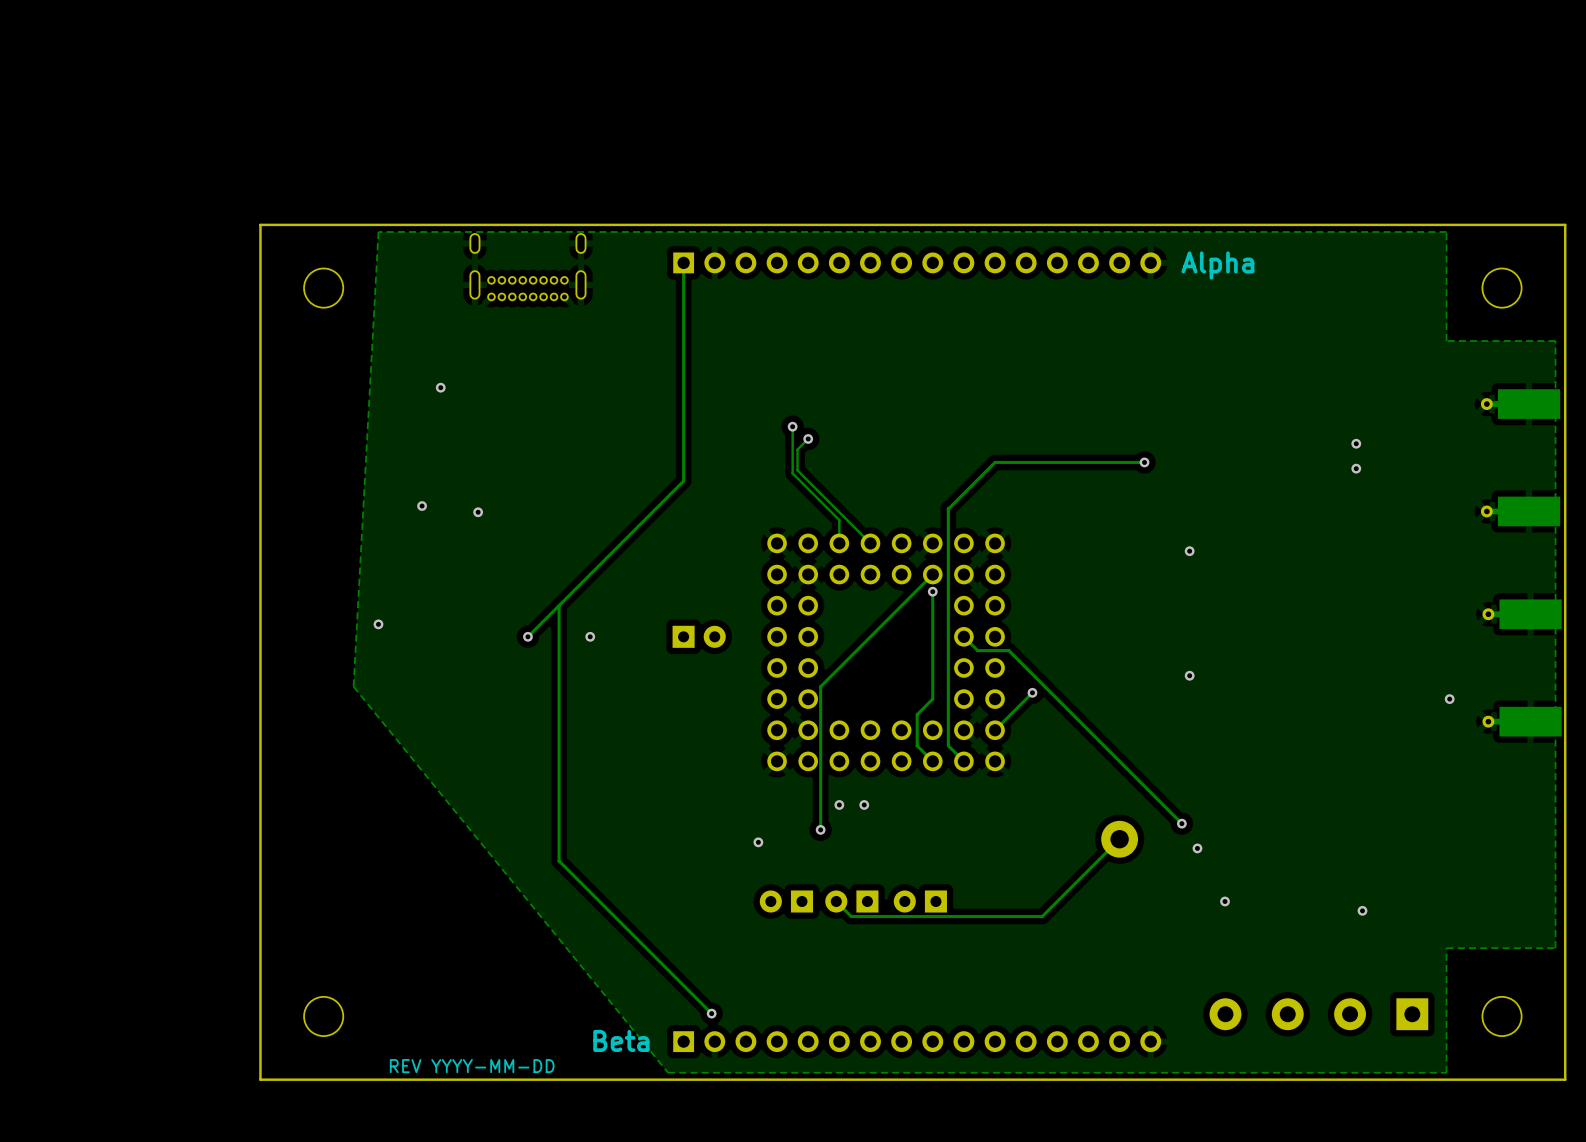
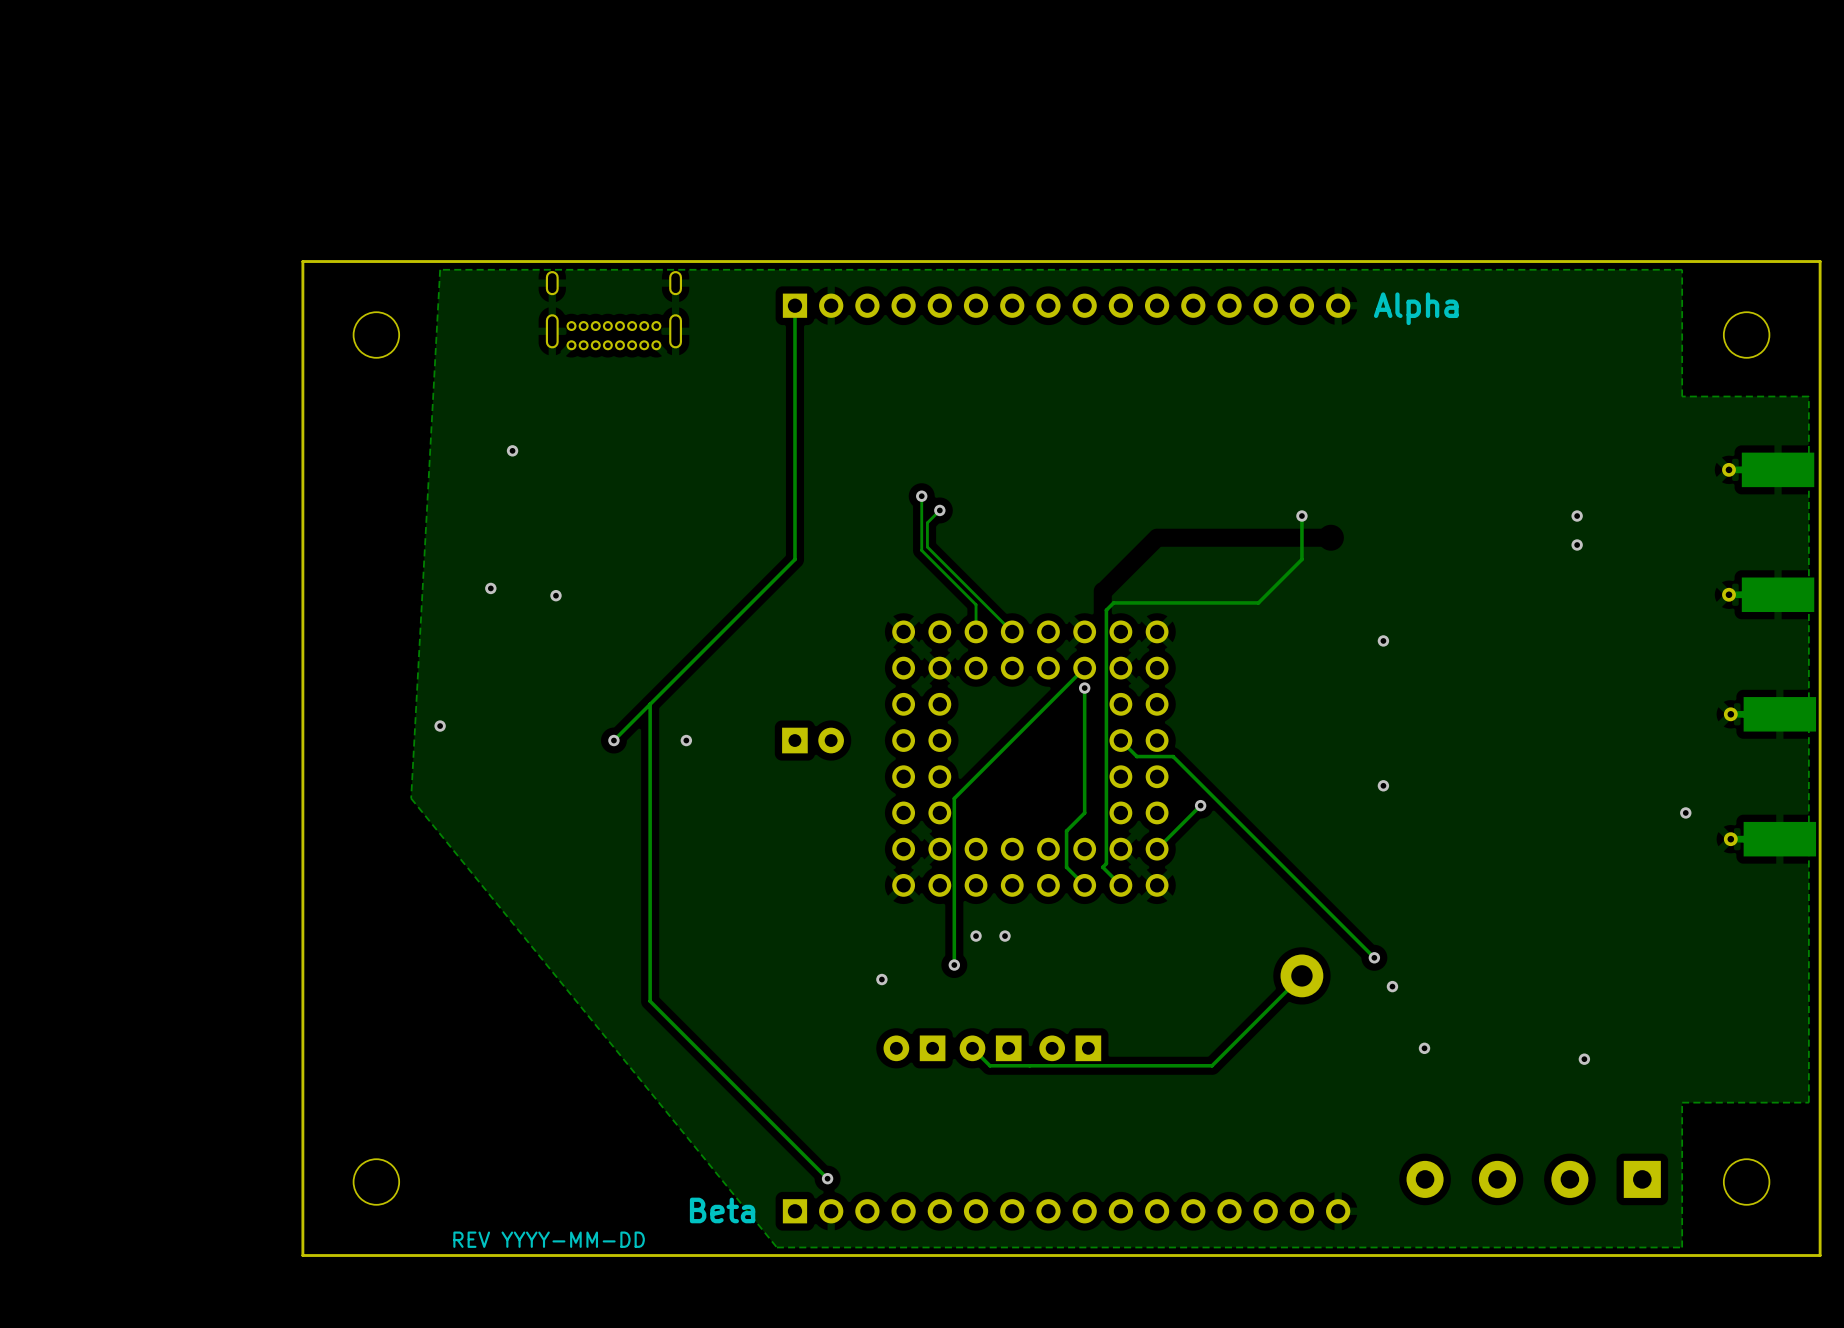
track: (1144, 462) (995, 462) (948, 509) -> none
via position: (1144, 462) -> (1301, 516)
track: (948, 508) (948, 745) -> (1301, 516) (1301, 559) (1258, 602) (1113, 602) (1106, 610) (1106, 863) (1102, 867)

